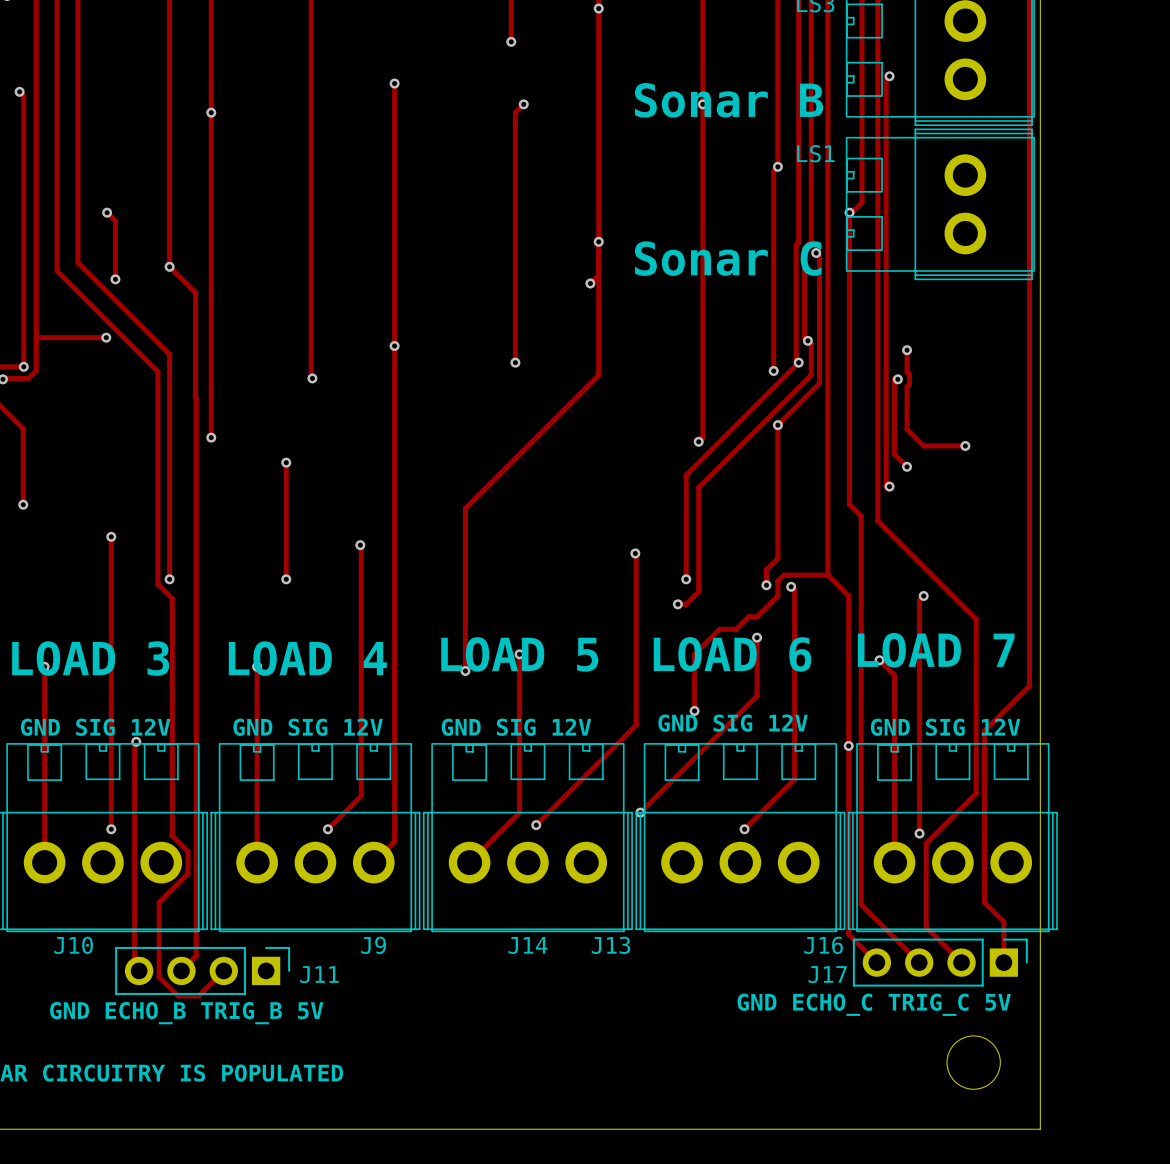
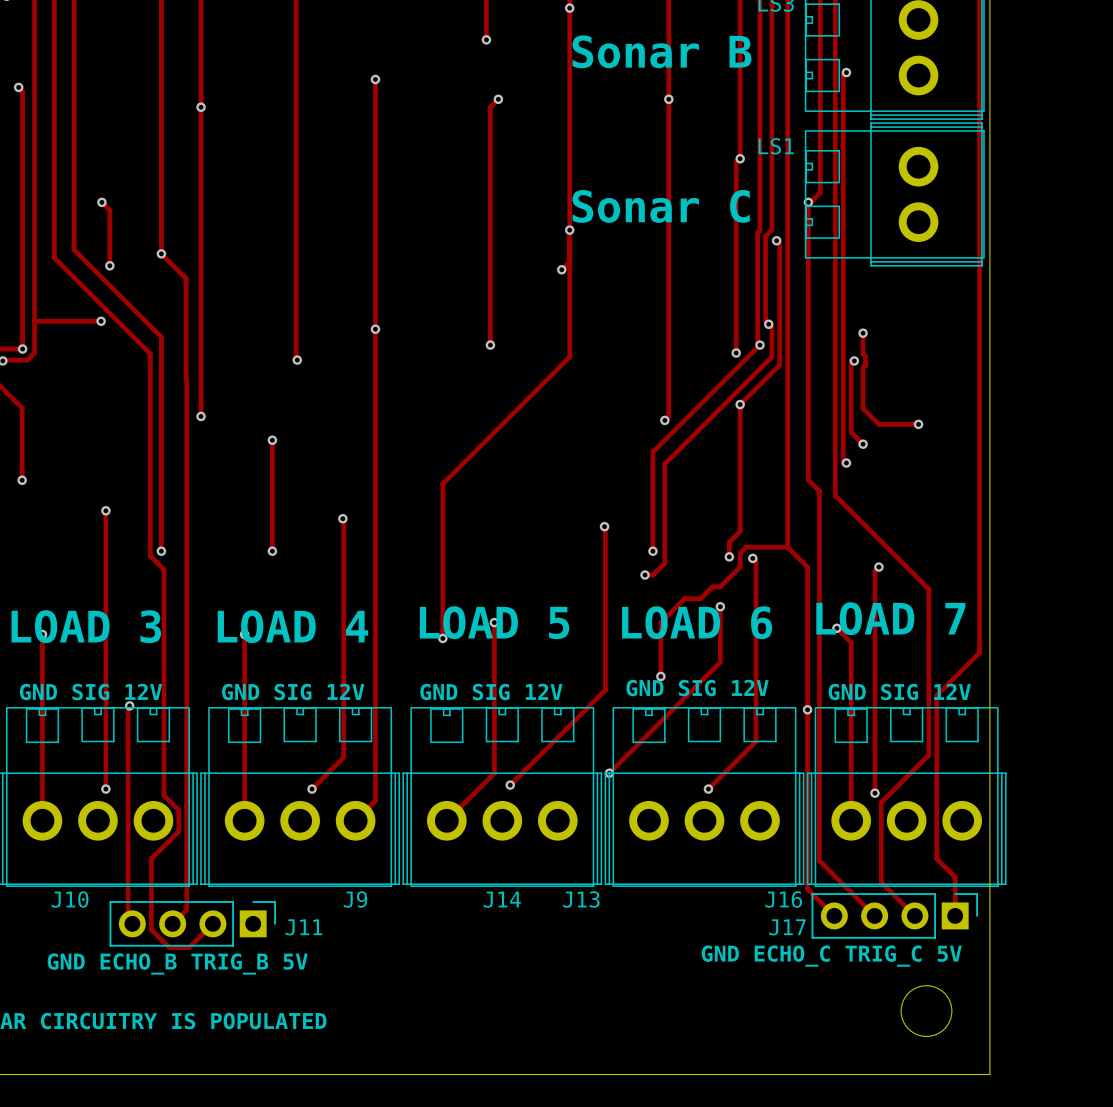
text position: Sonar B (729, 100) -> Sonar B (661, 51)
text position: Sonar C (728, 258) -> Sonar C (661, 206)

